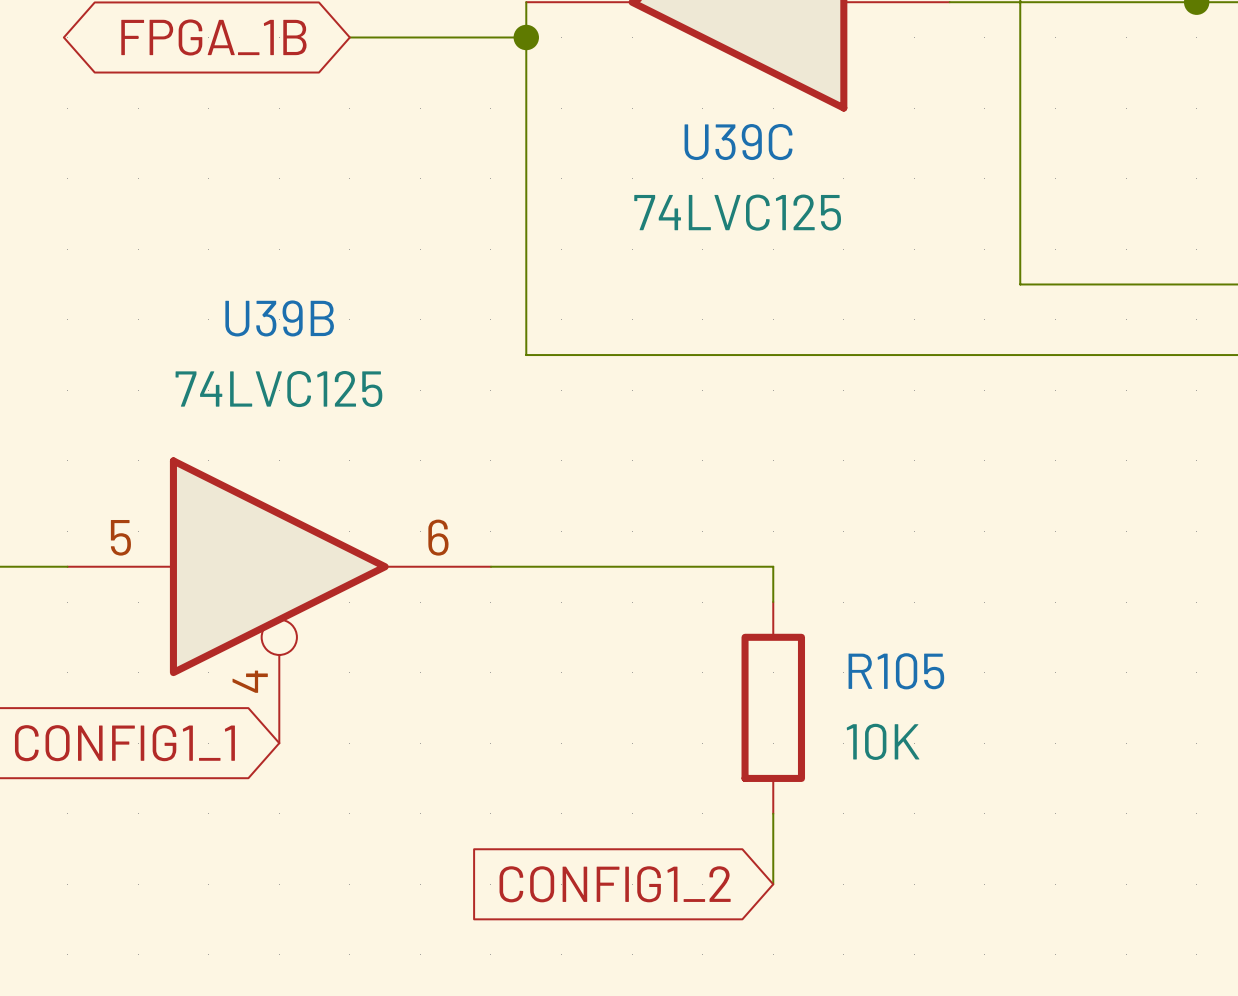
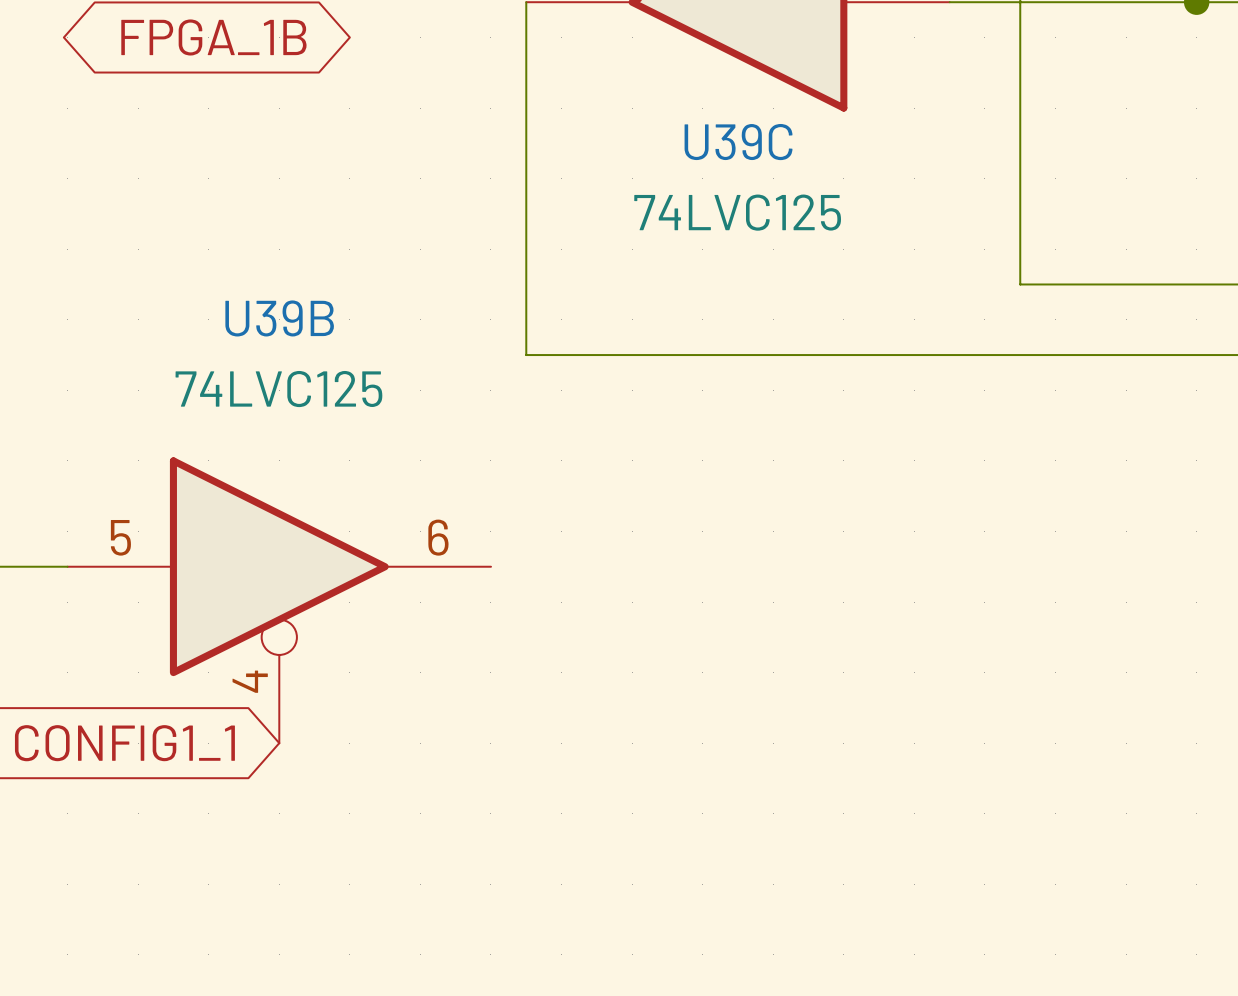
wire: (349, 37) (526, 37) -> none
junction: (526, 37) -> none
wire: (490, 566) (773, 566) (773, 602) -> none
R105: 10K (773, 707) -> none
wire: (773, 813) (773, 884) -> none
global label: CONFIG1_2 (615, 884) -> none

